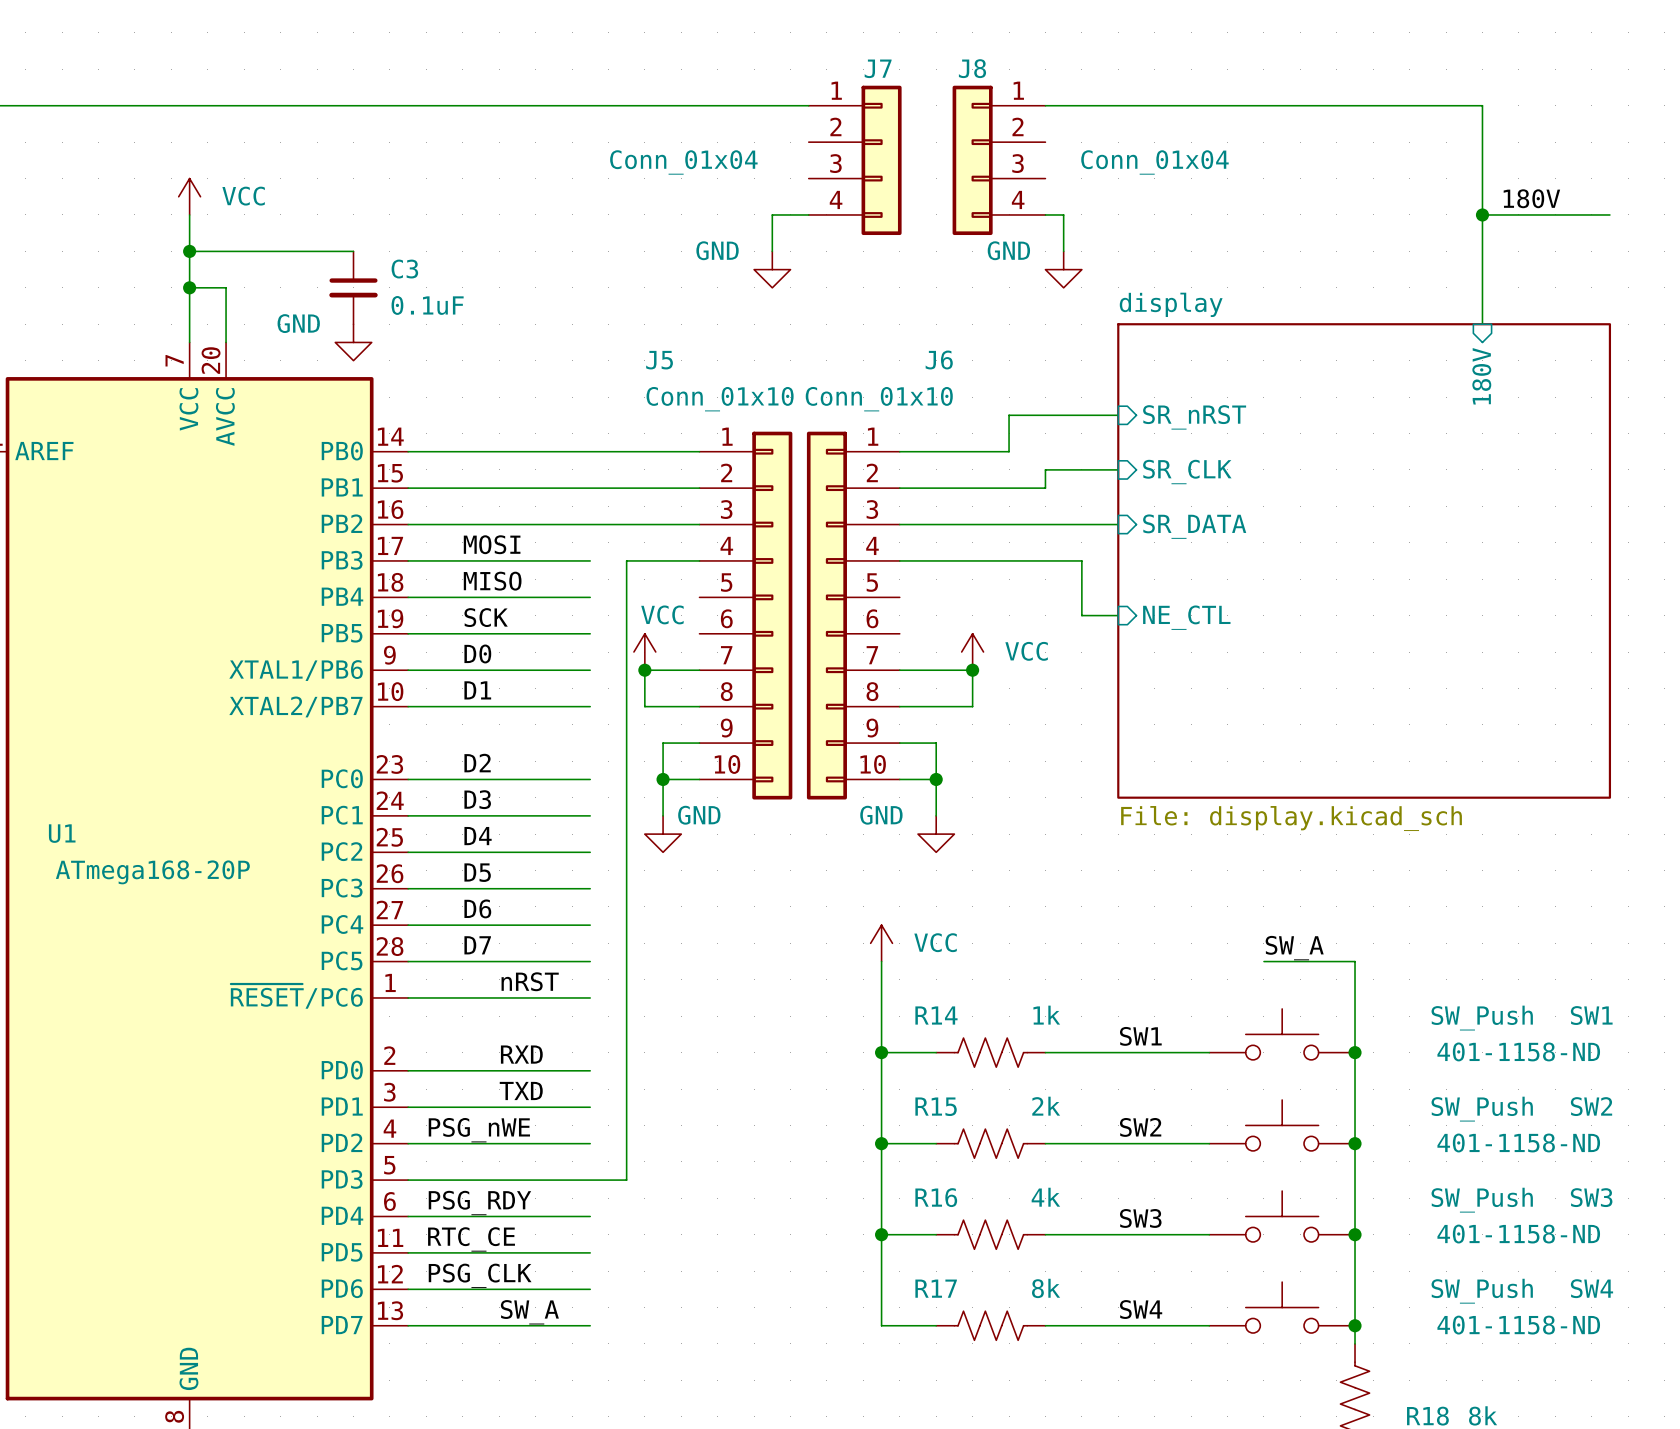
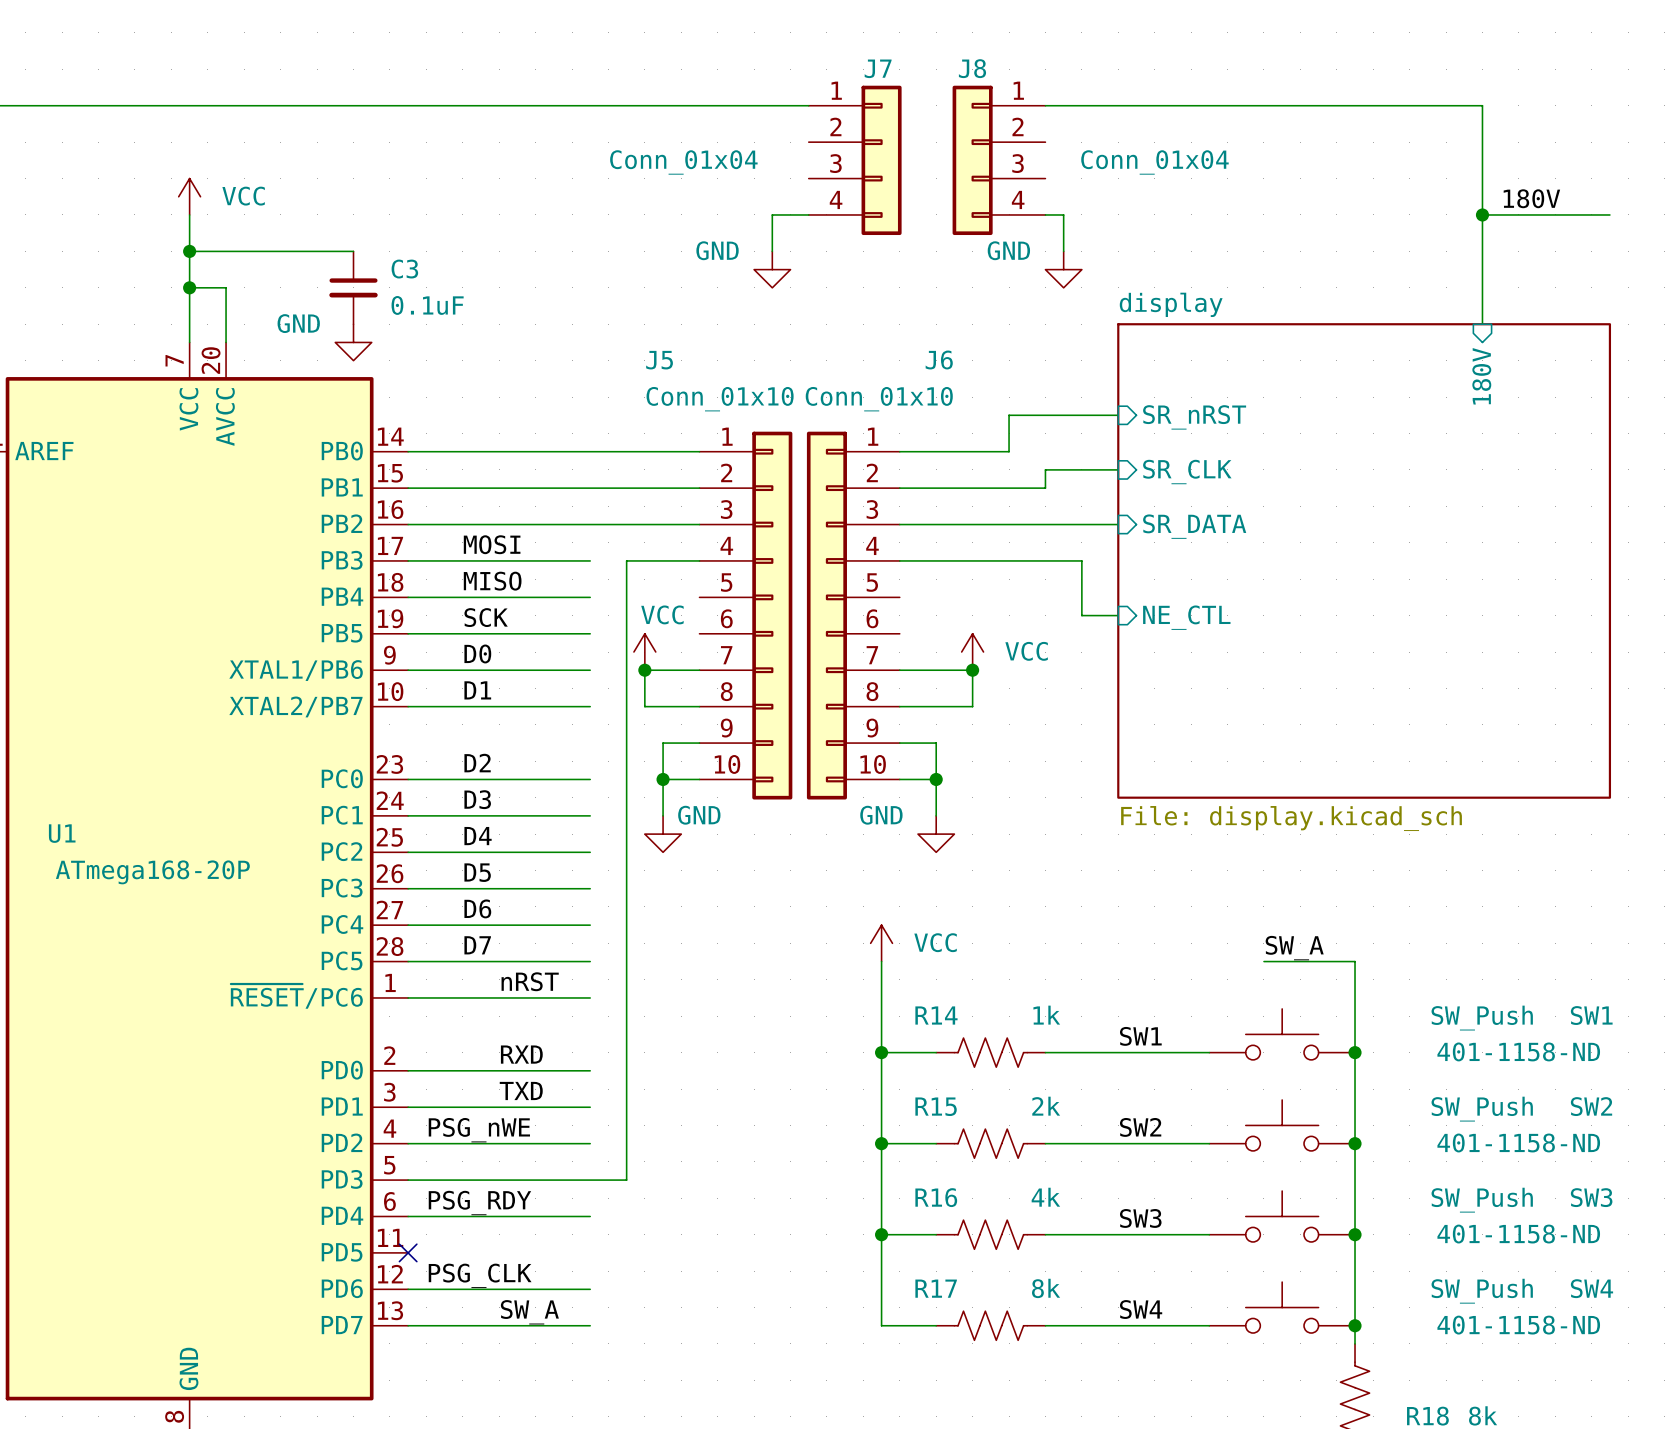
label: RTC_CE (471, 1239) -> none
wire: (408, 1252) (590, 1252) -> none
no-connect mark: none -> (408, 1252)

